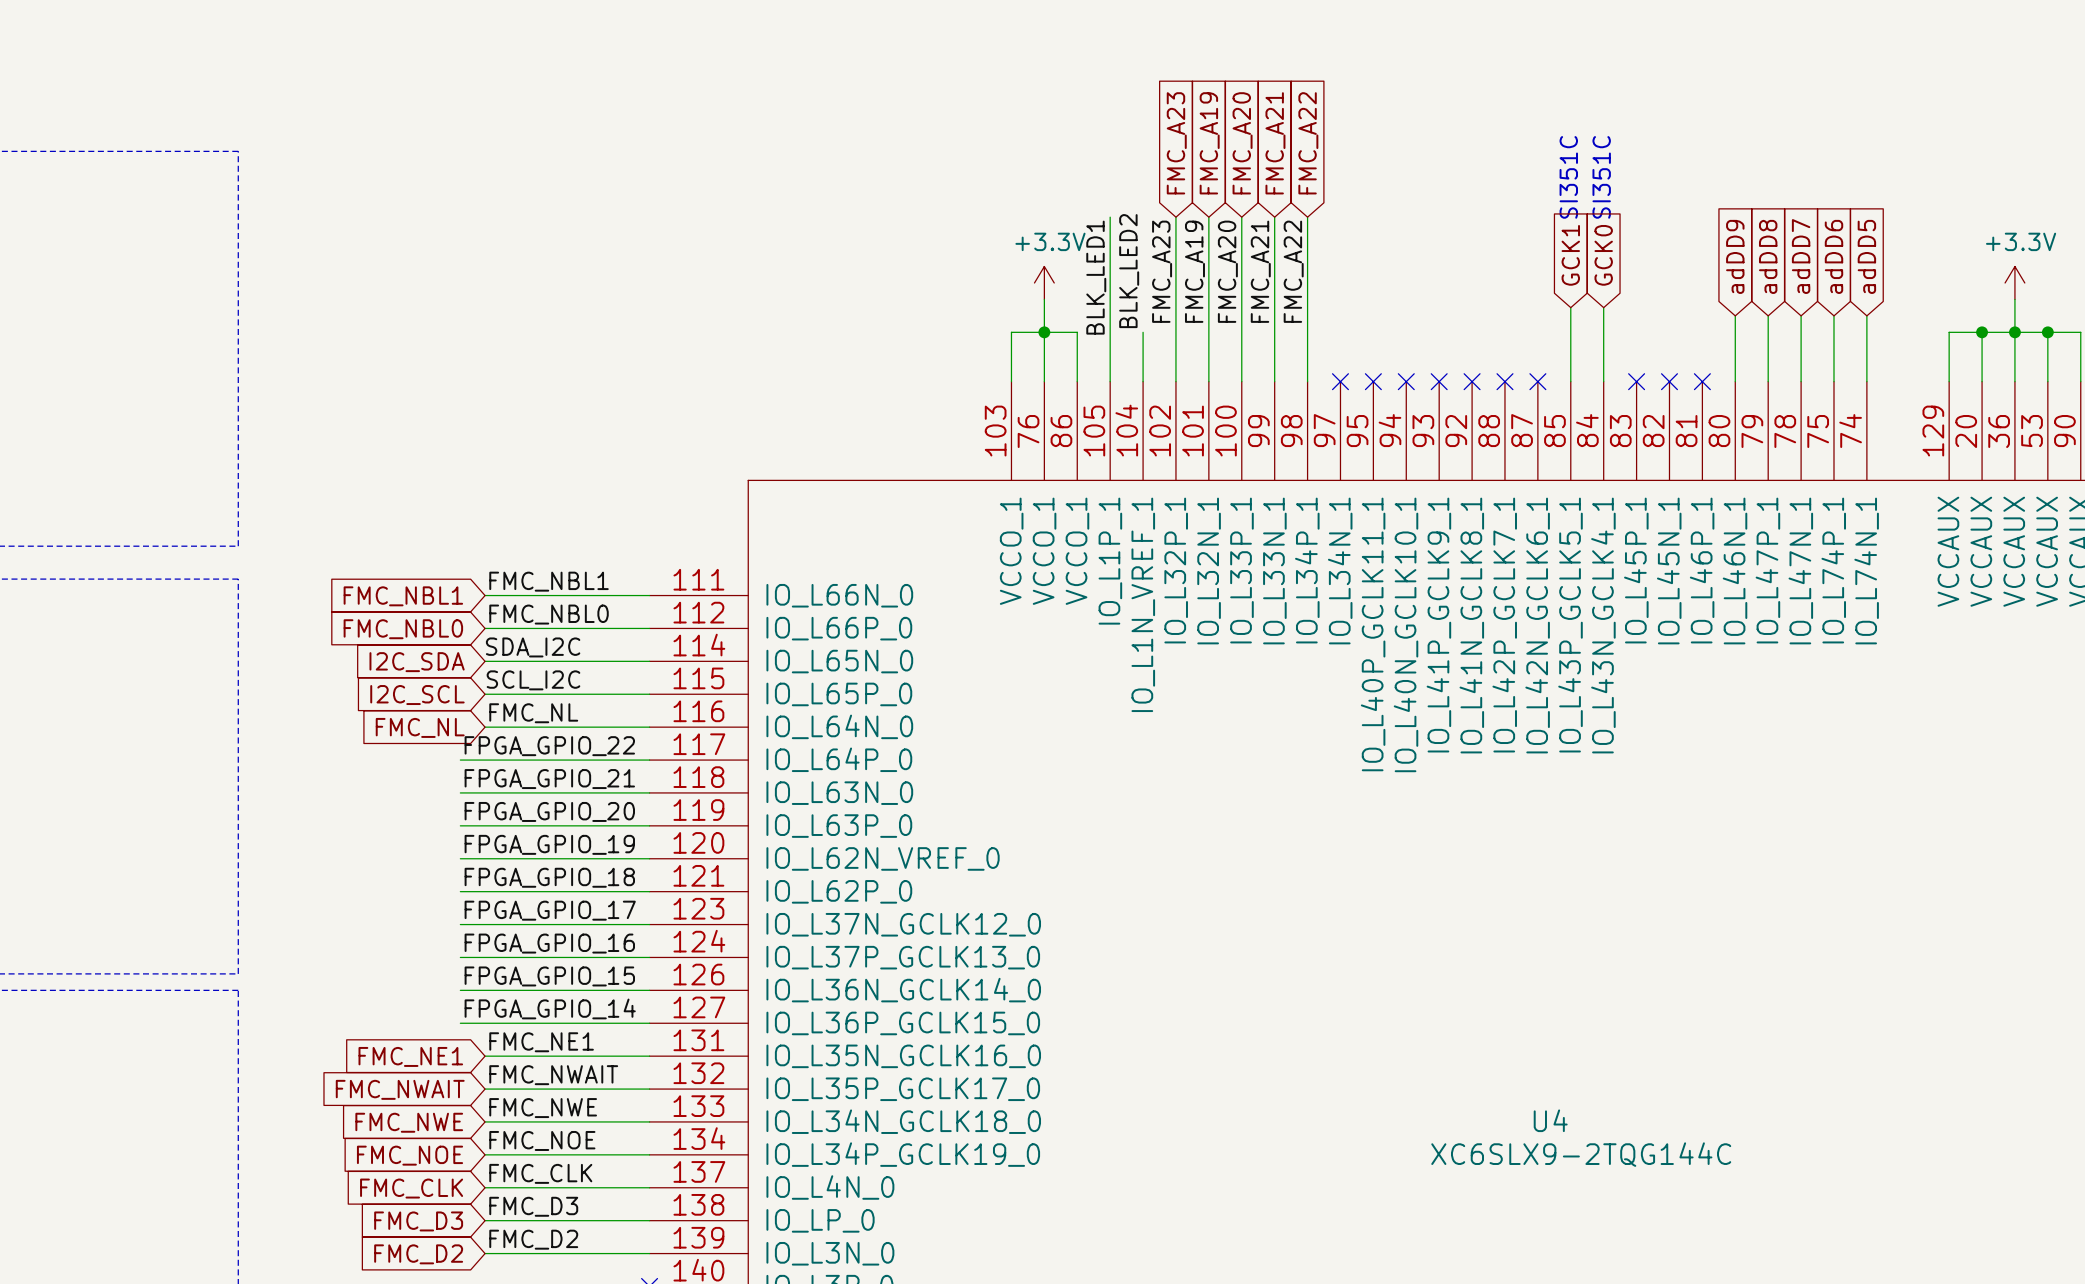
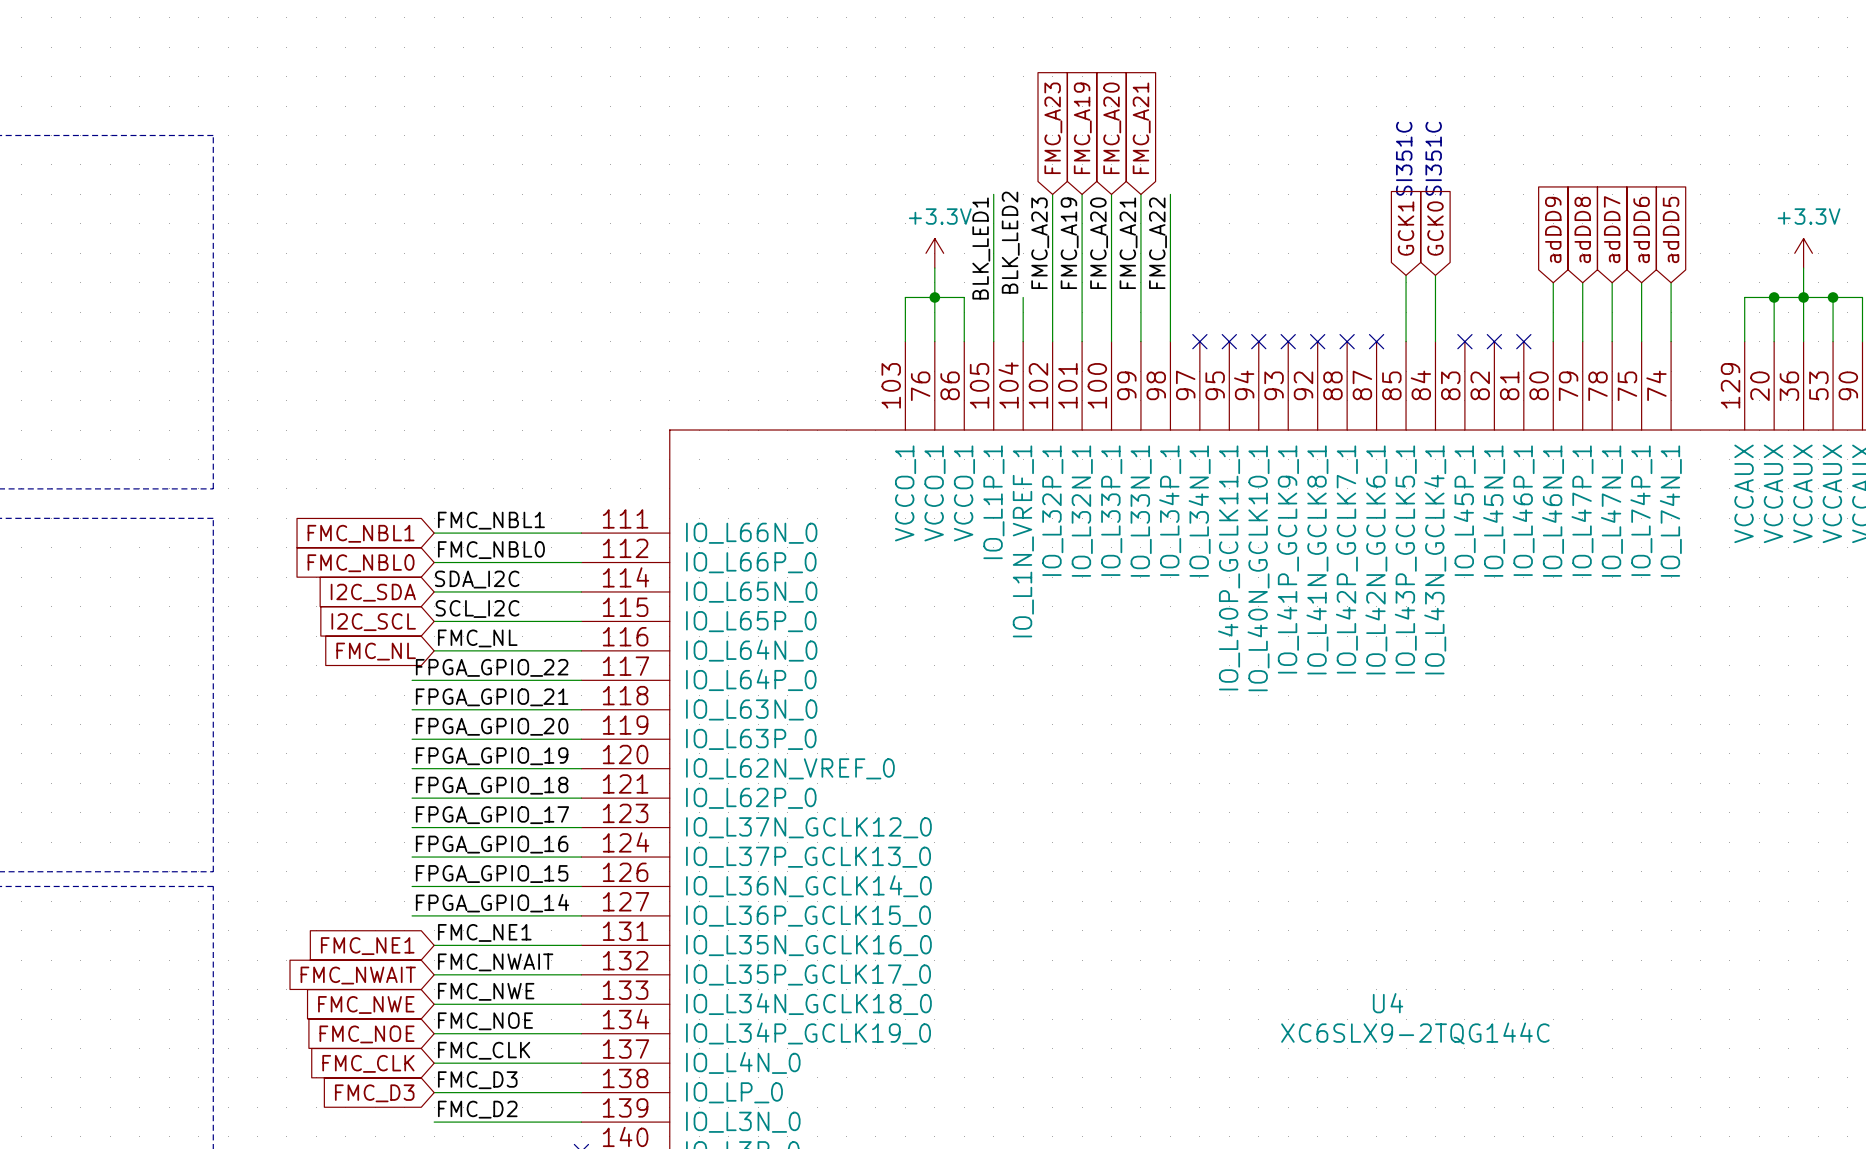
global label: FMC_A22 (1308, 143) -> none
global label: FMC_D2 (418, 1254) -> none

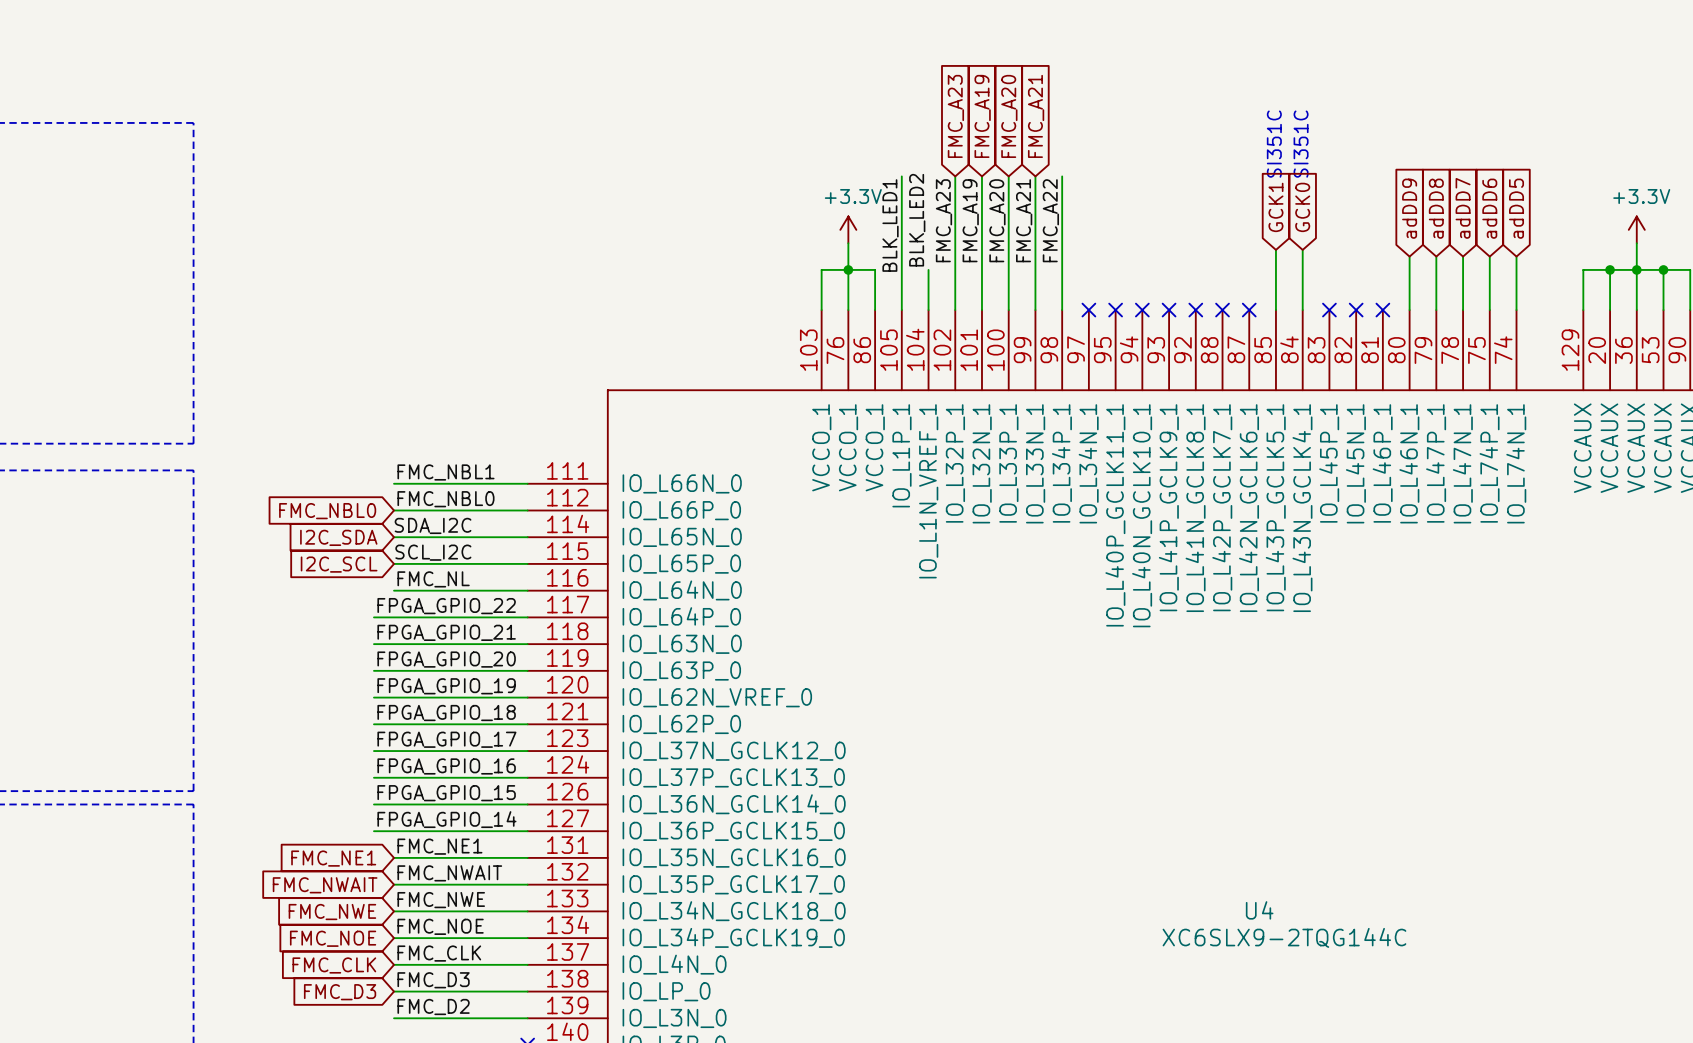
global label: FMC_NBL1 (361, 533) -> none
global label: FMC_NL (376, 651) -> none

